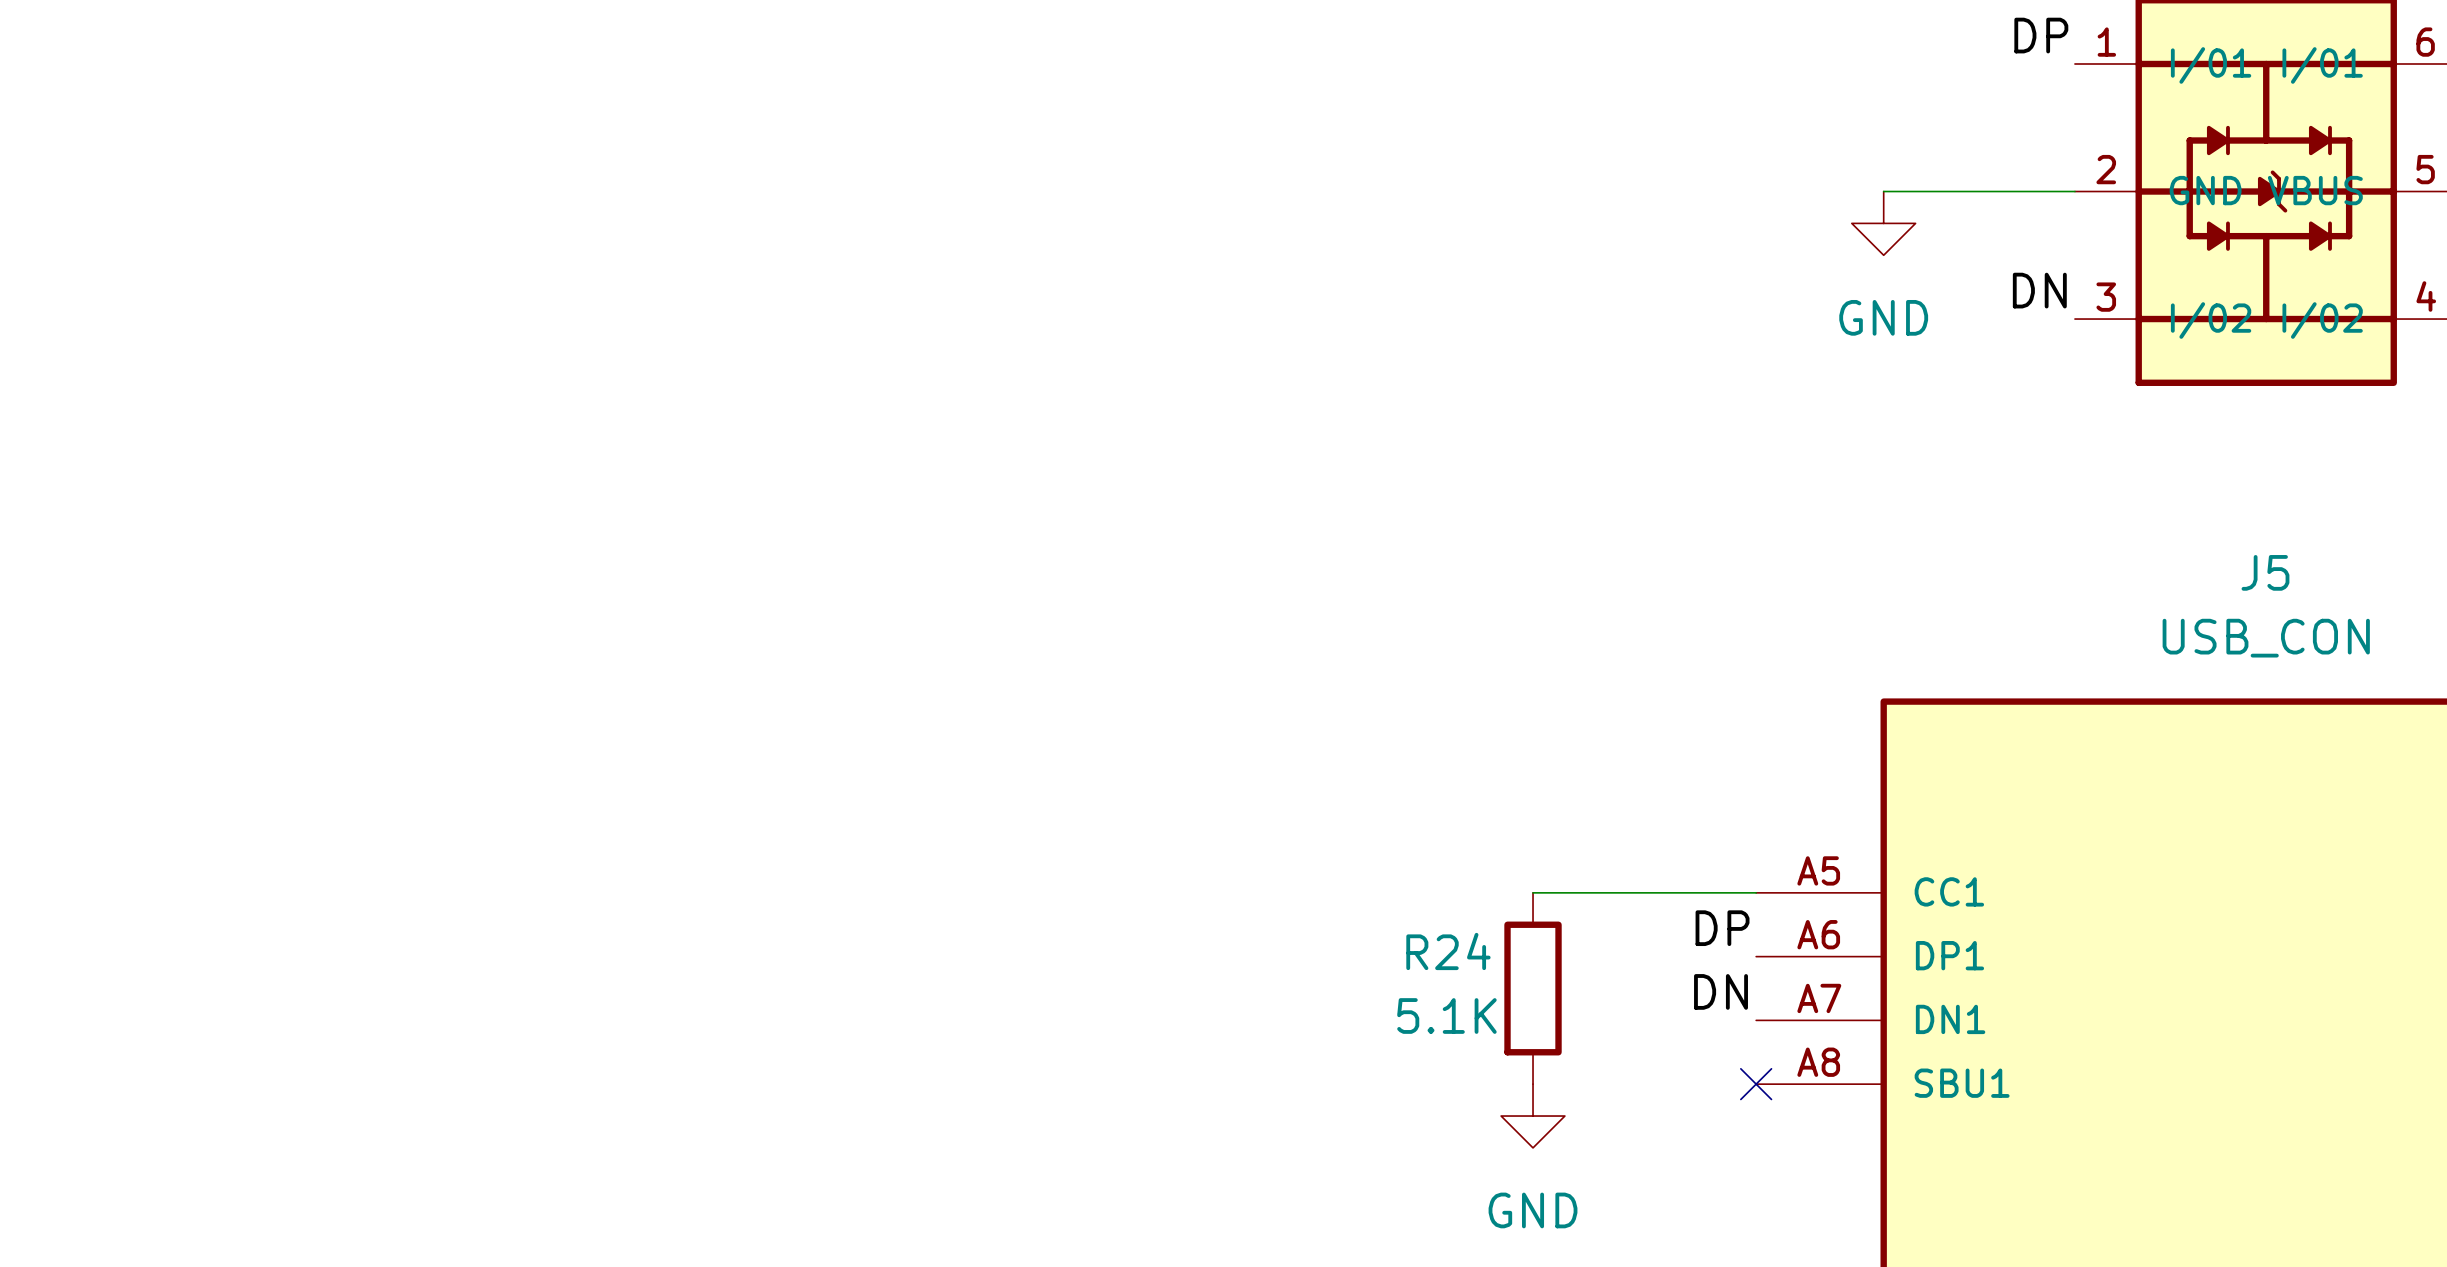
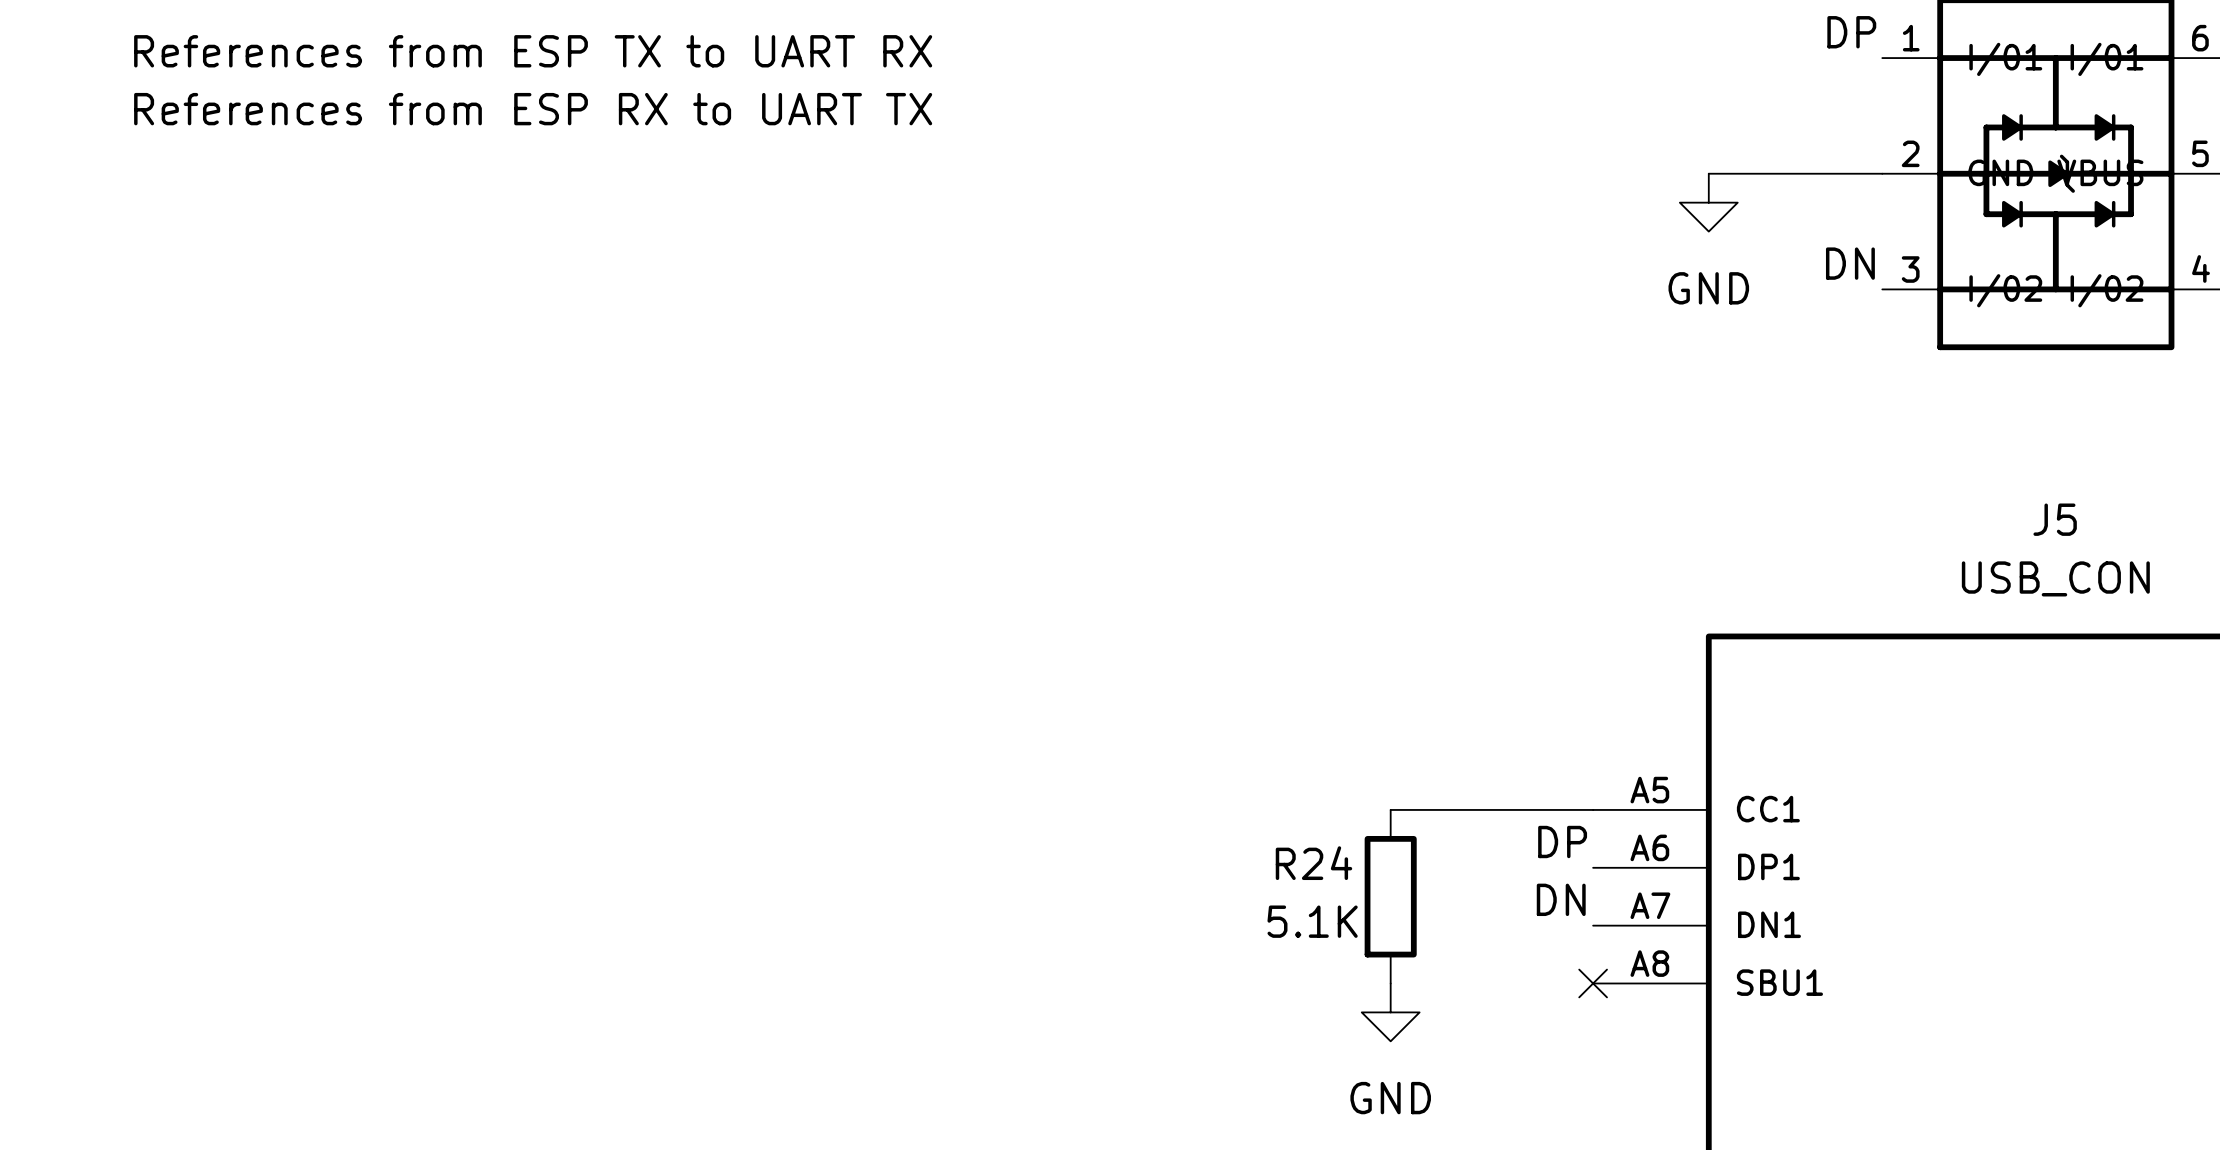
text: none -> References from ESP TX to UART RX (533, 51)
text: none -> References from ESP RX to UART TX (533, 109)

